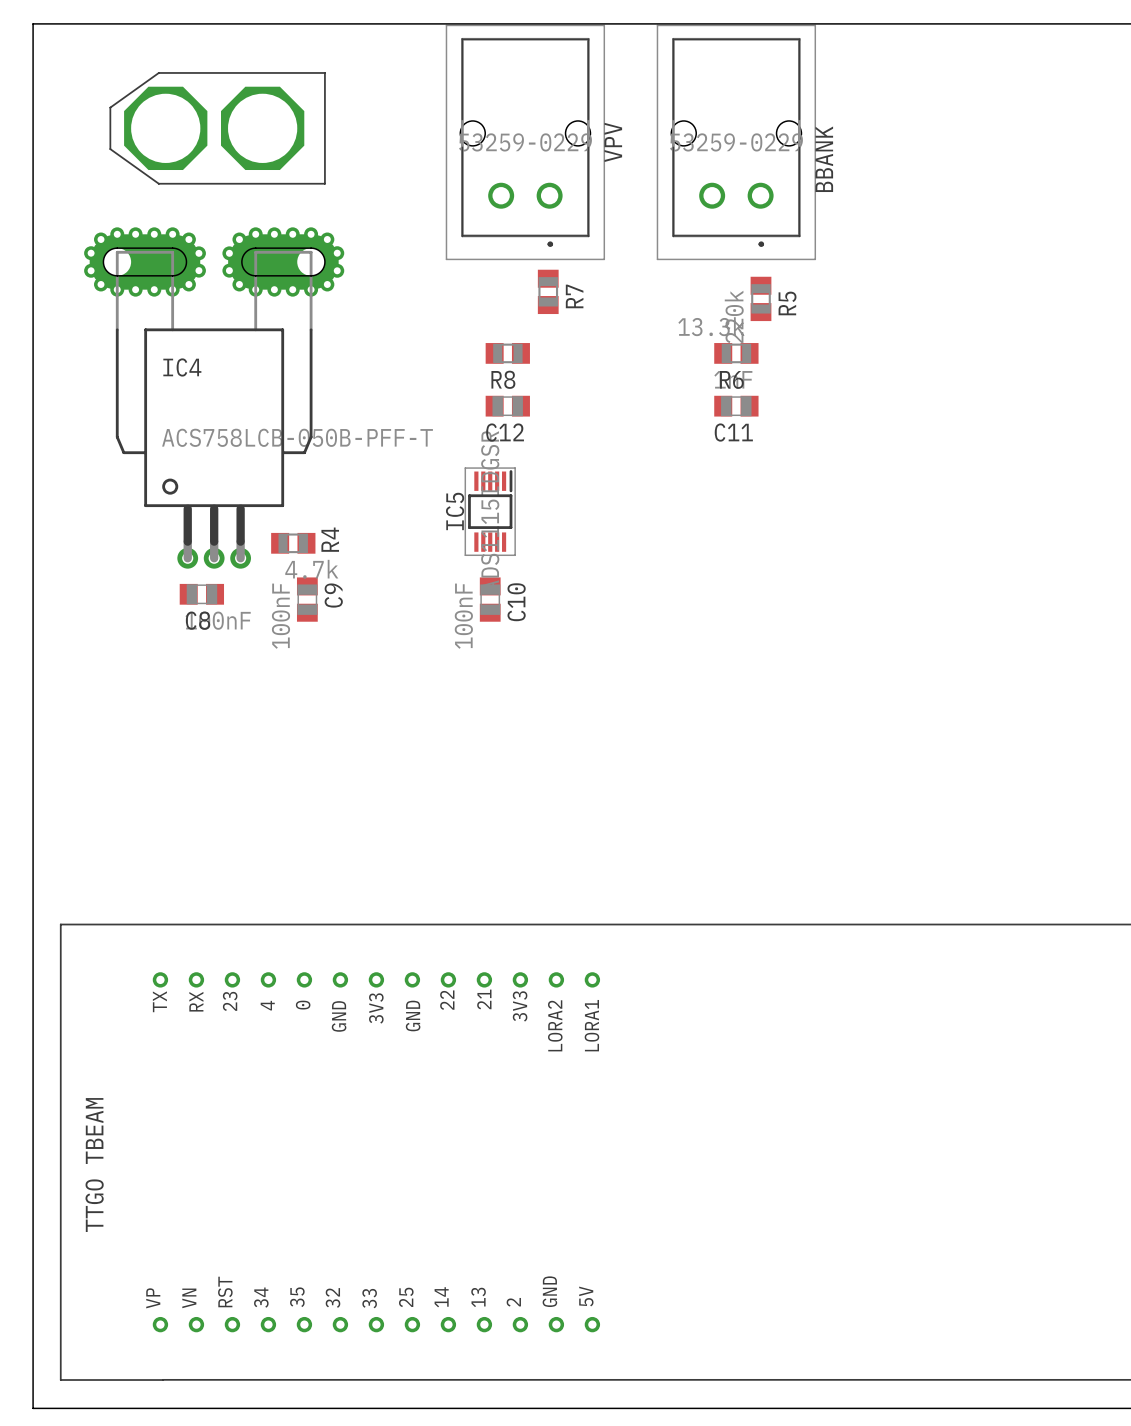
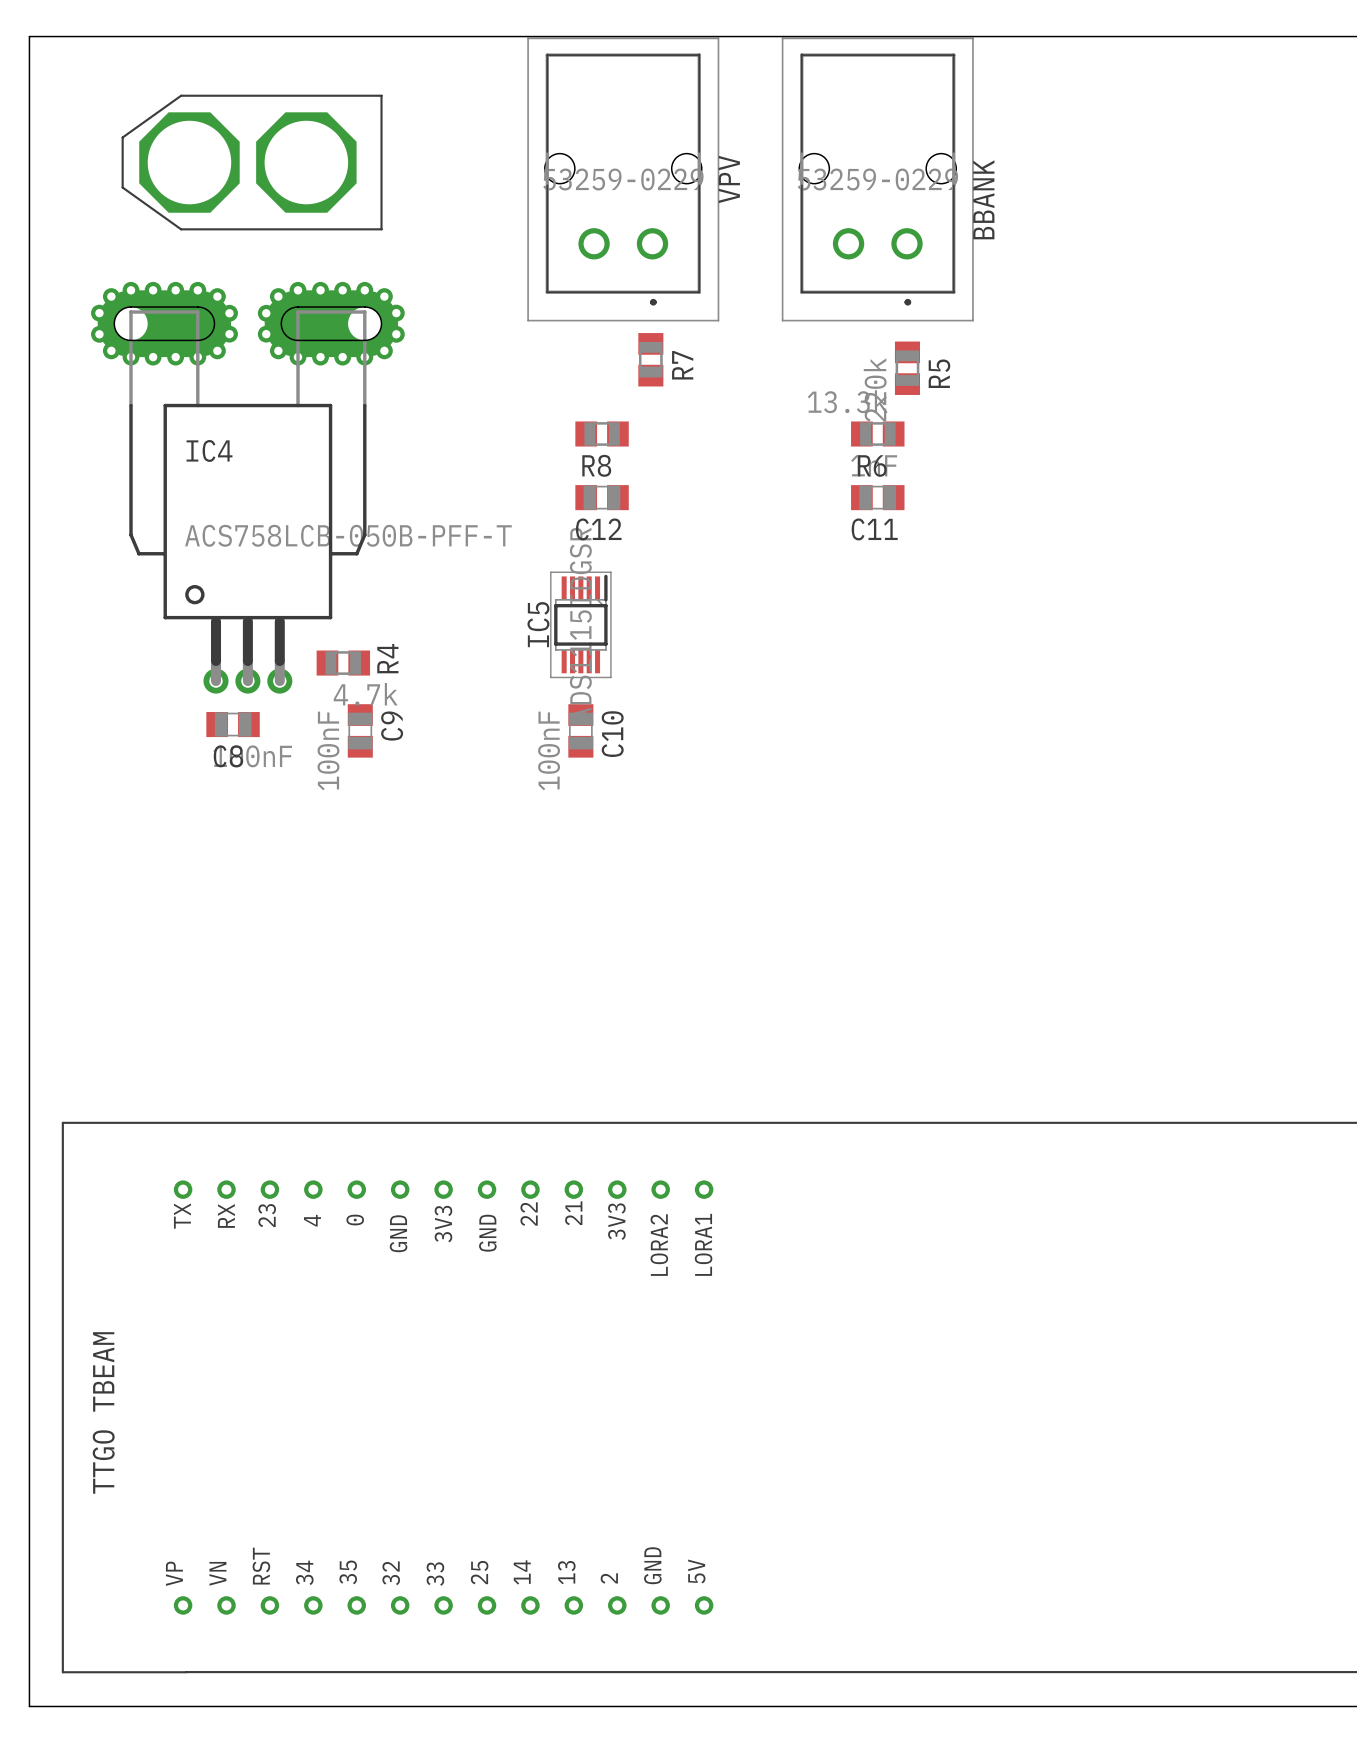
IC5 footprint: [464, 467, 516, 556] -> [550, 571, 612, 678]

